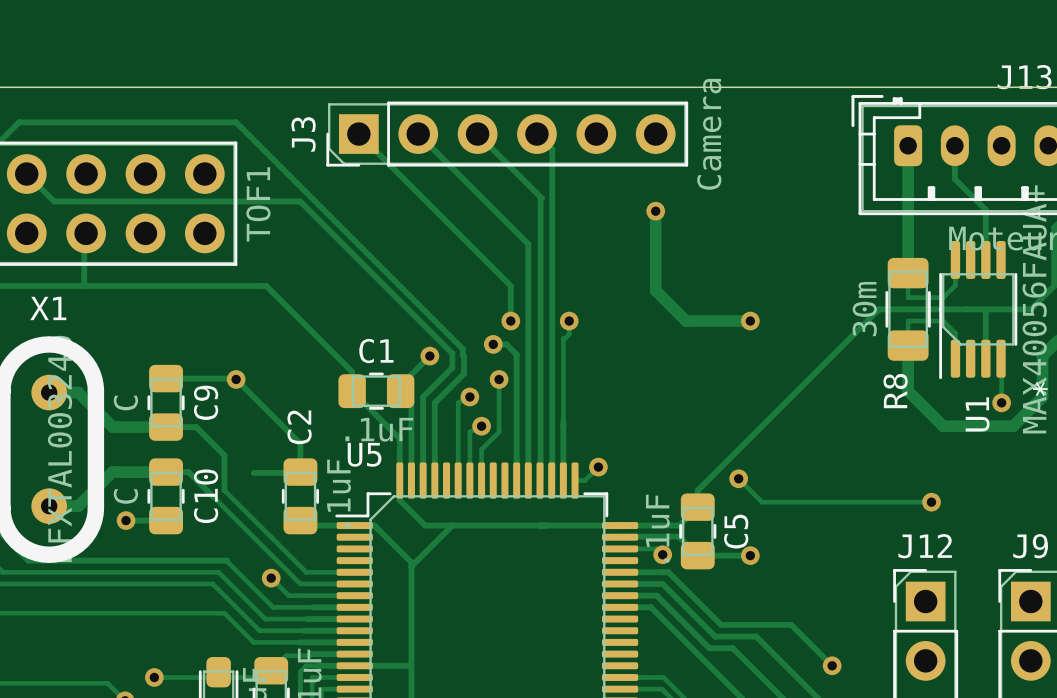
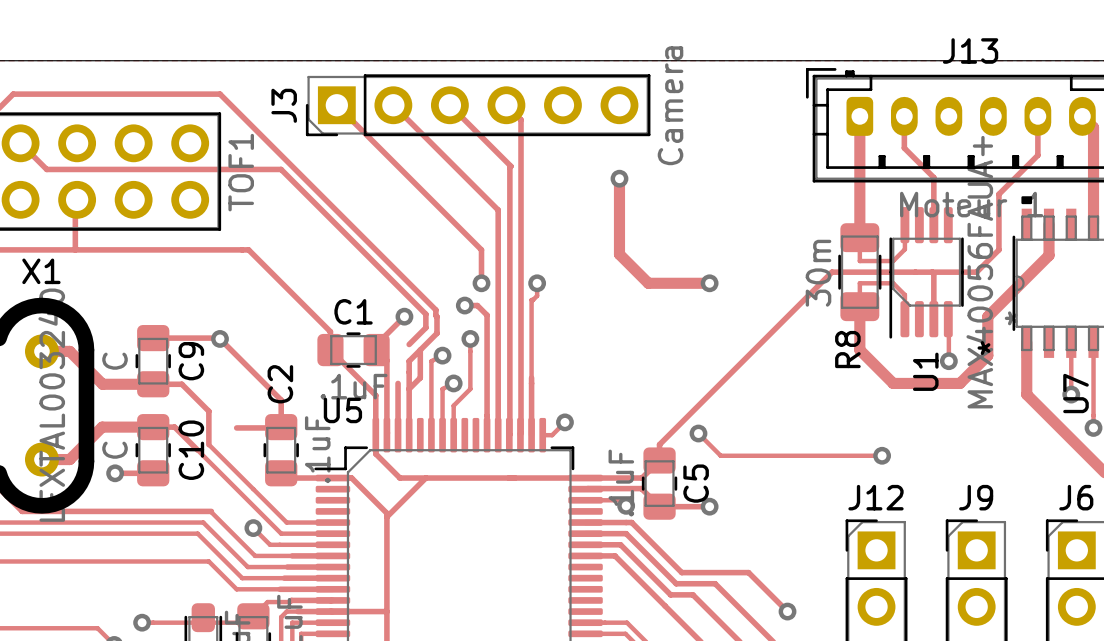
track: (434, 385) (423, 397) (423, 426) -> none
track: none -> (420, 350) (420, 377) (409, 389)

